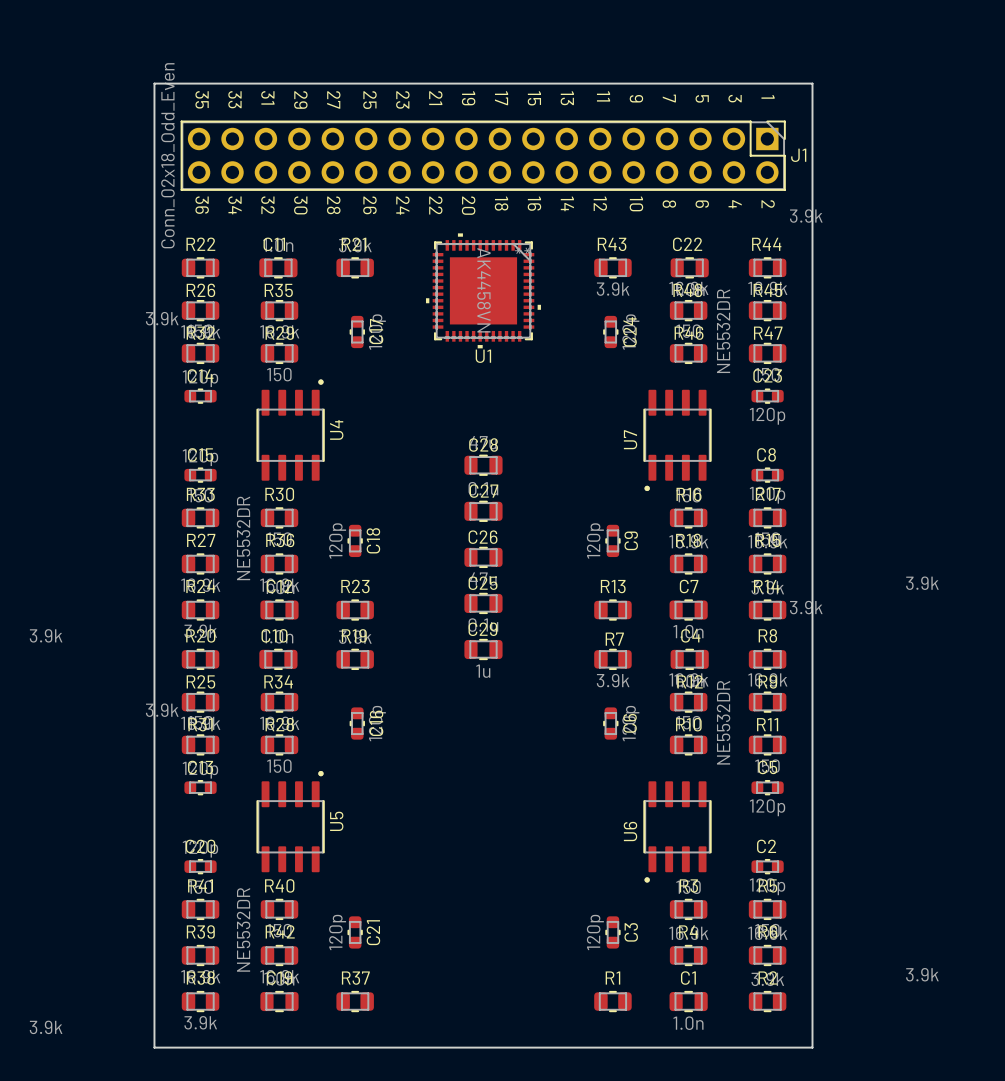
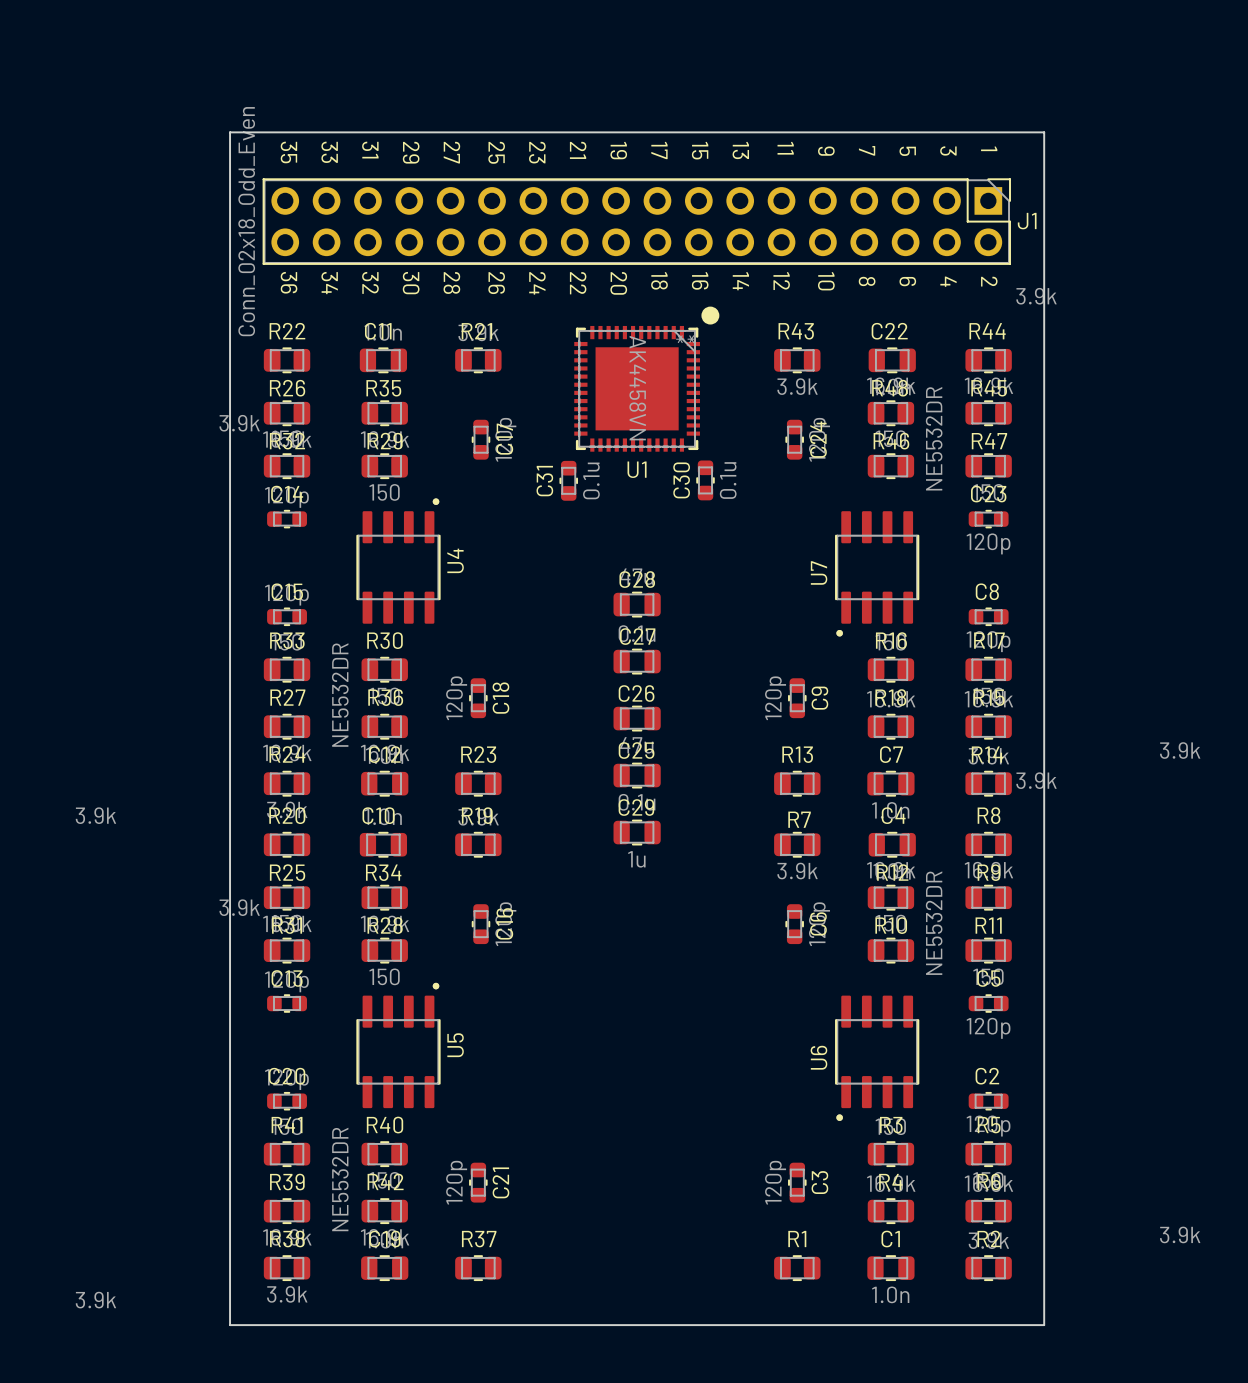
U1 footprint: [425, 233, 541, 349] -> [574, 306, 720, 452]
C30: none -> 0.1u (705, 480)
C31: none -> 0.1u (568, 480)

